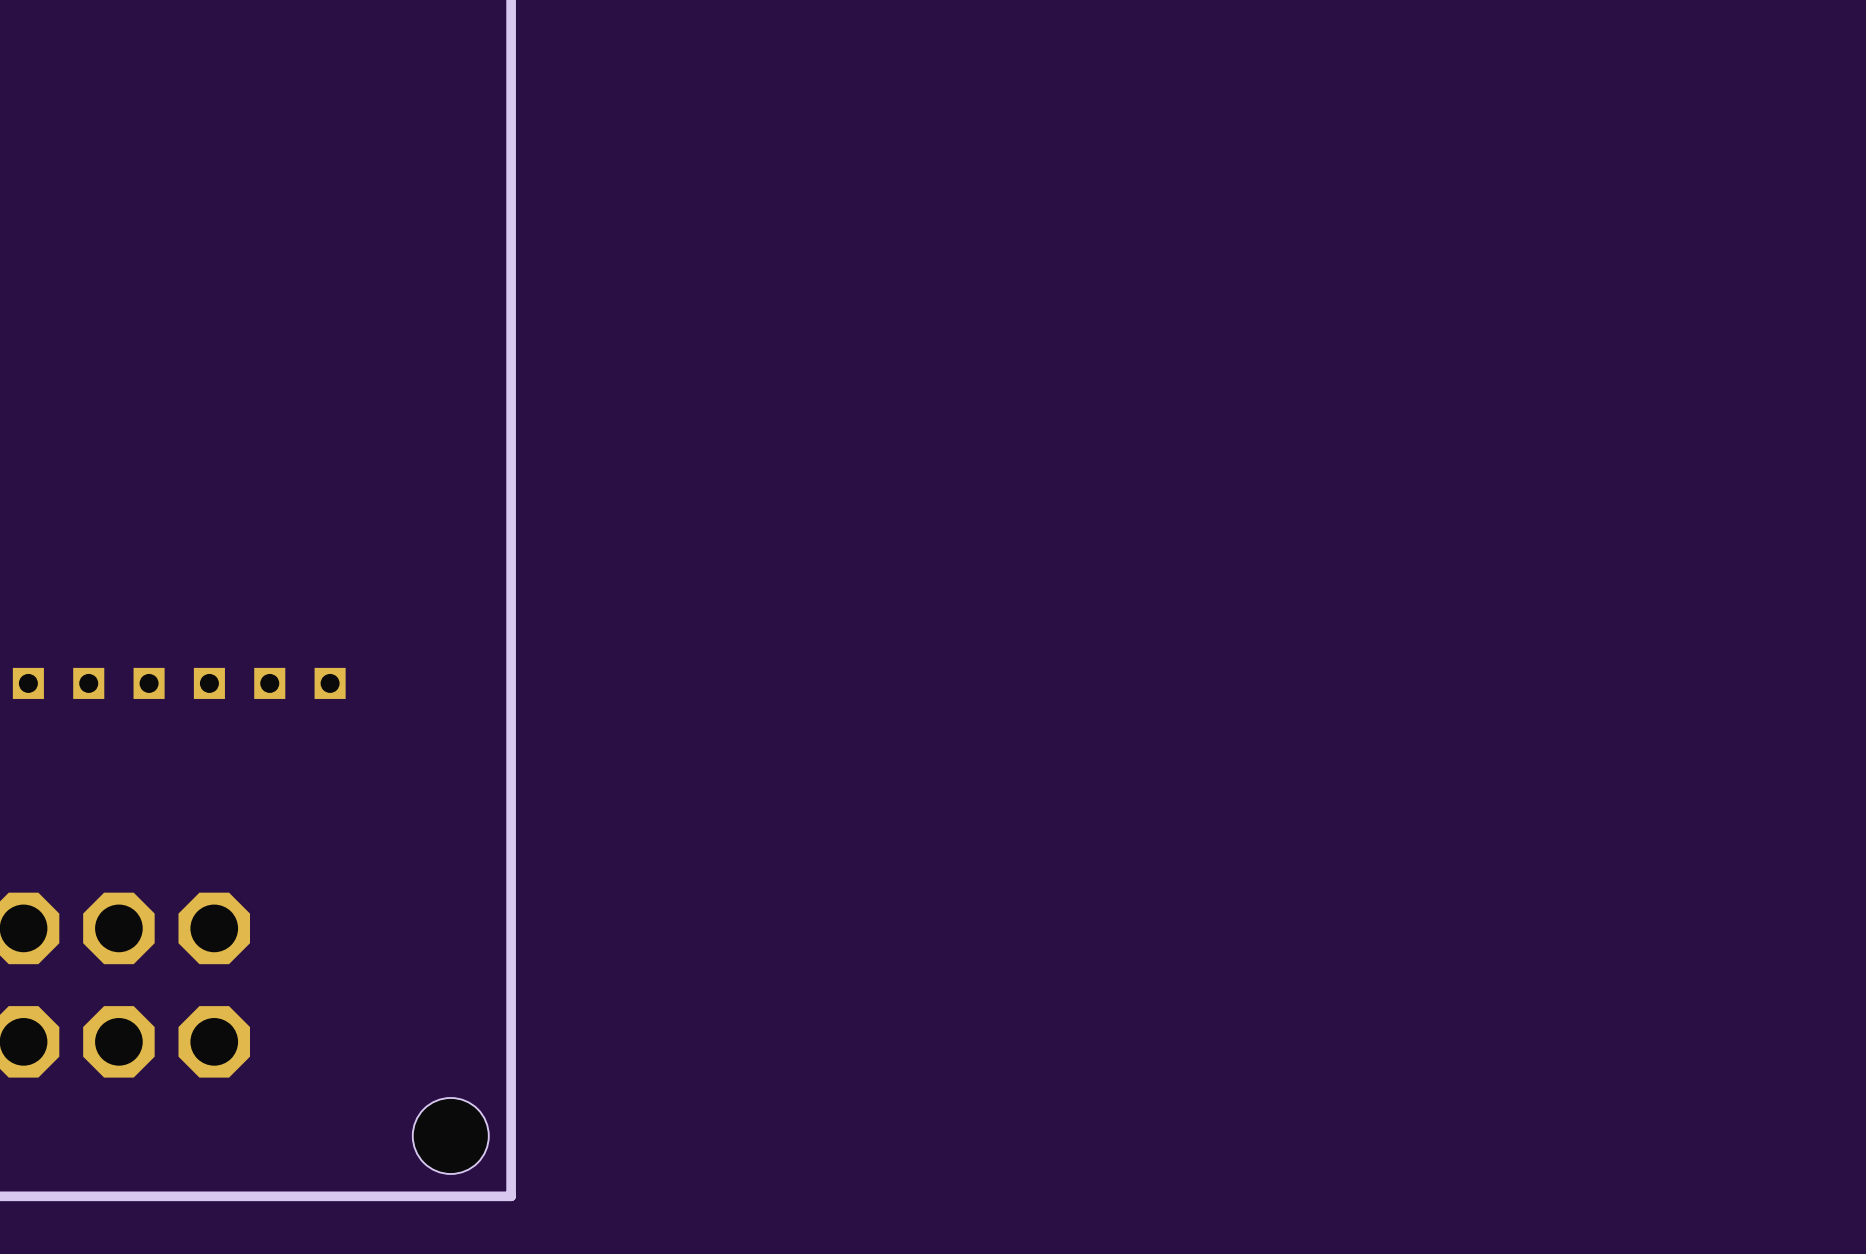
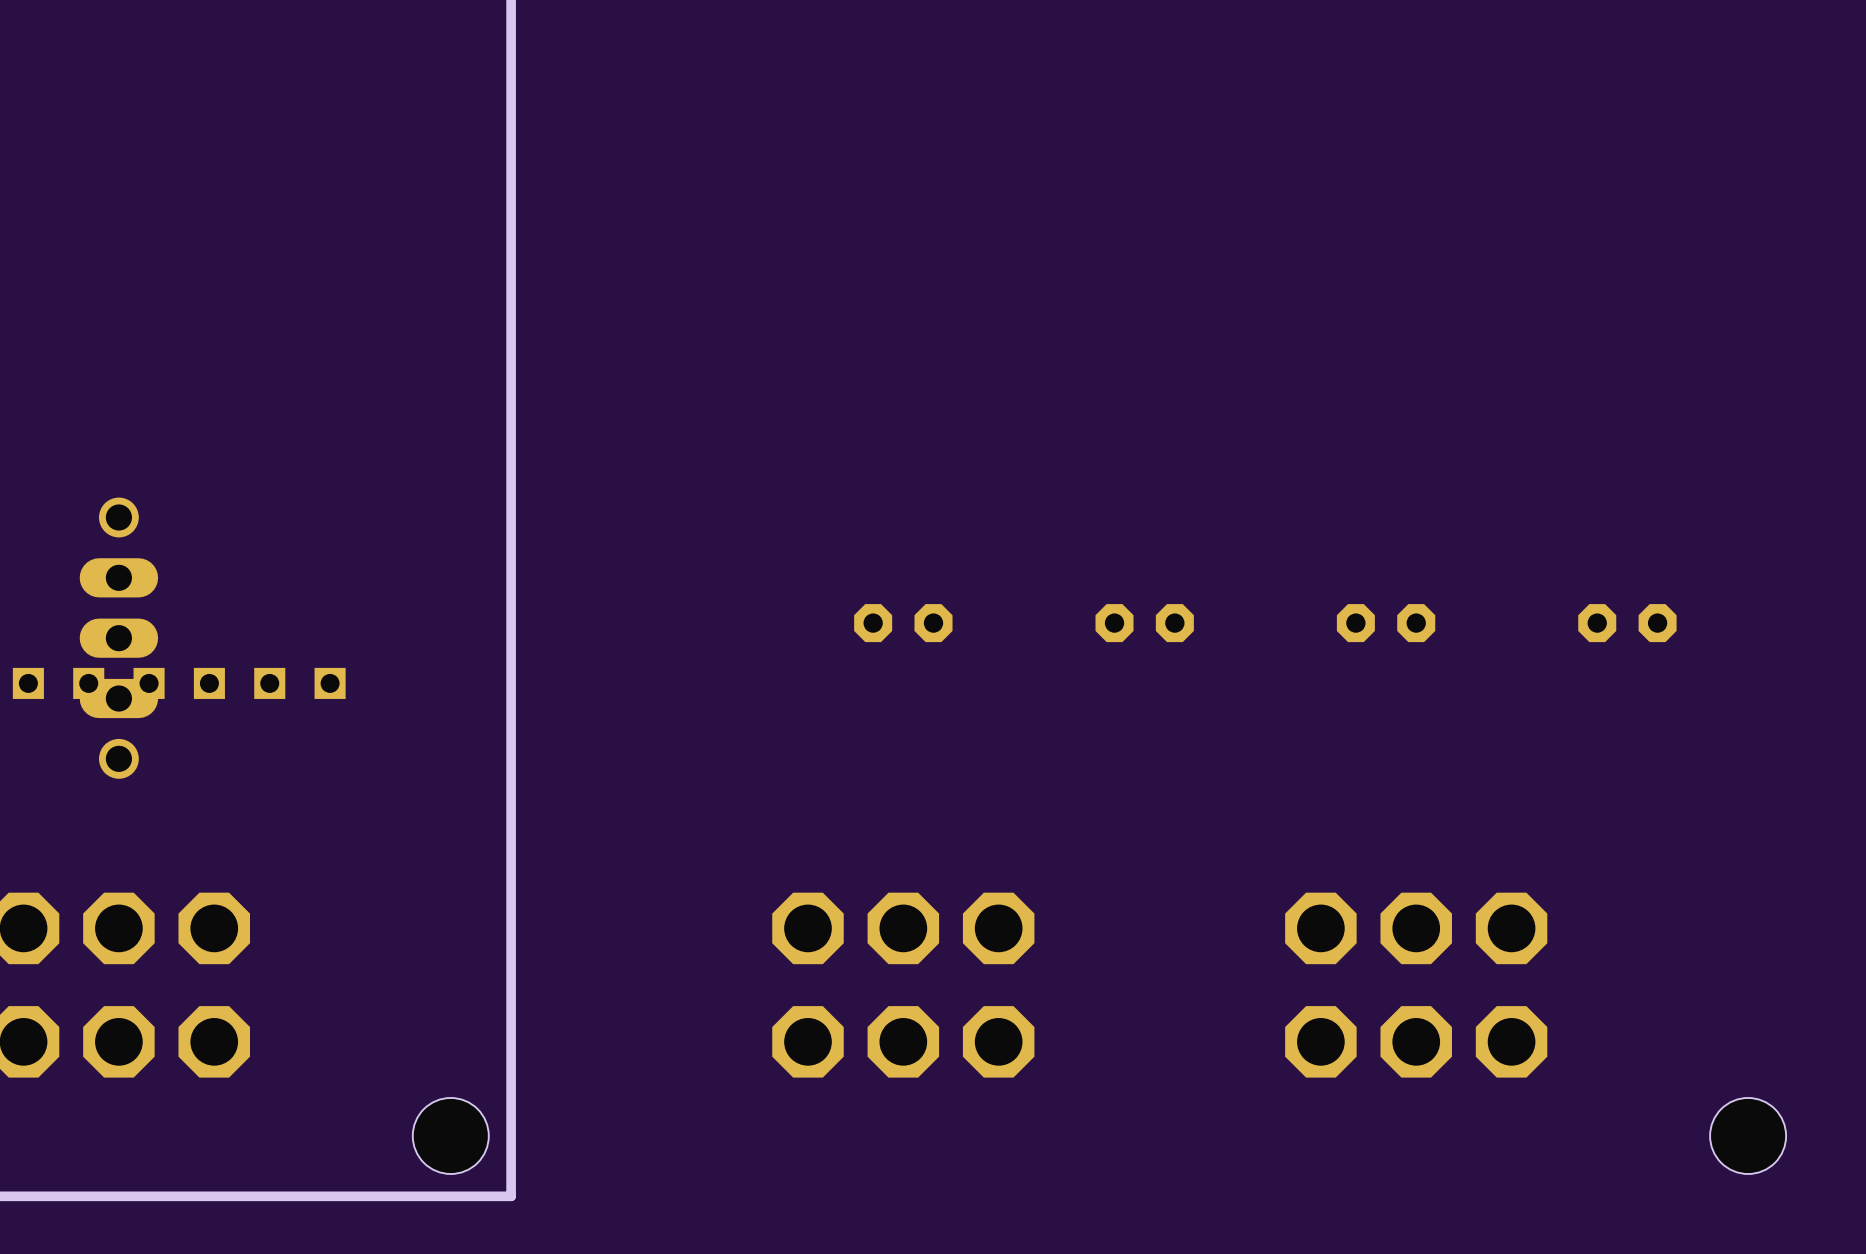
part: none -> (903, 623)
part: none -> (1144, 623)
part: none -> (1386, 623)
part: none -> (1627, 623)
part: none -> (118, 638)
part: none -> (903, 985)
part: none -> (1416, 985)
hole: none -> (1748, 1135)

